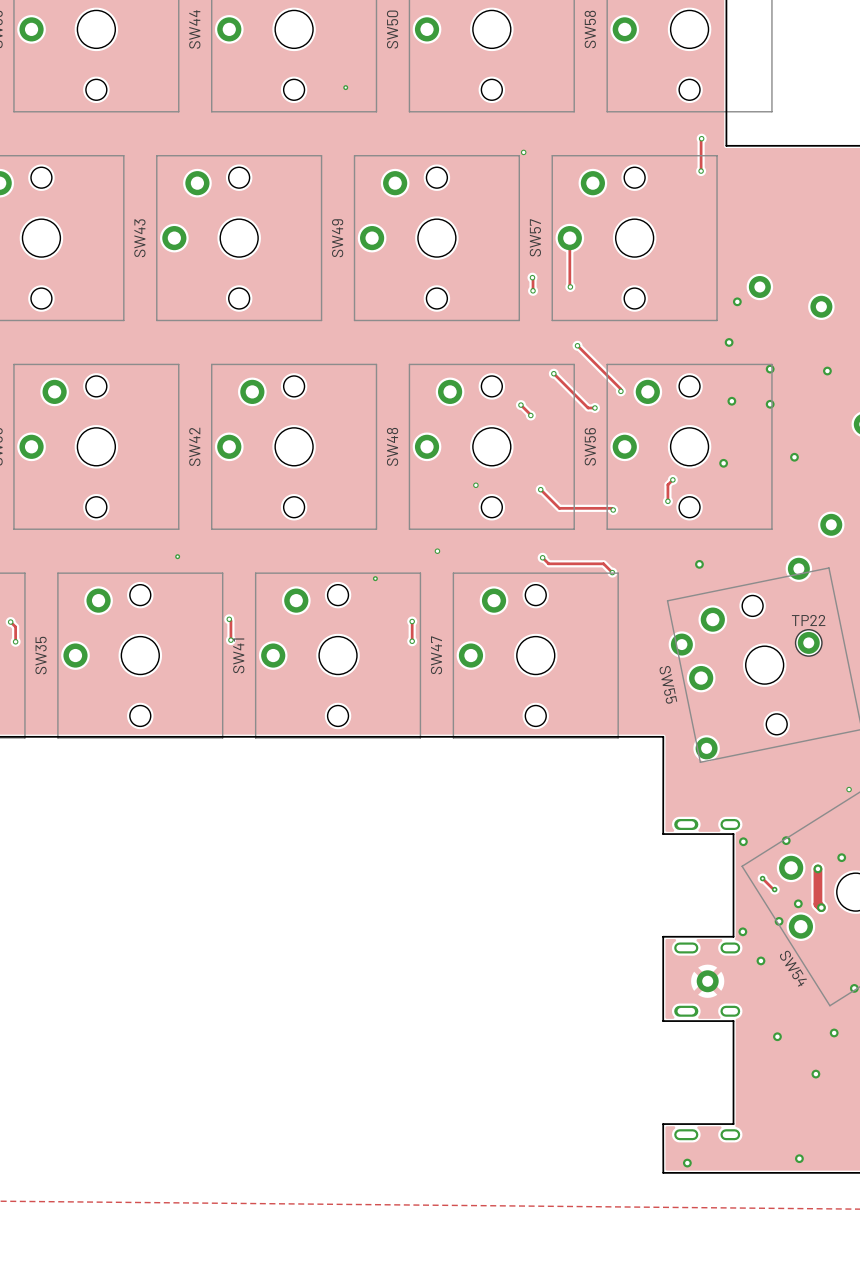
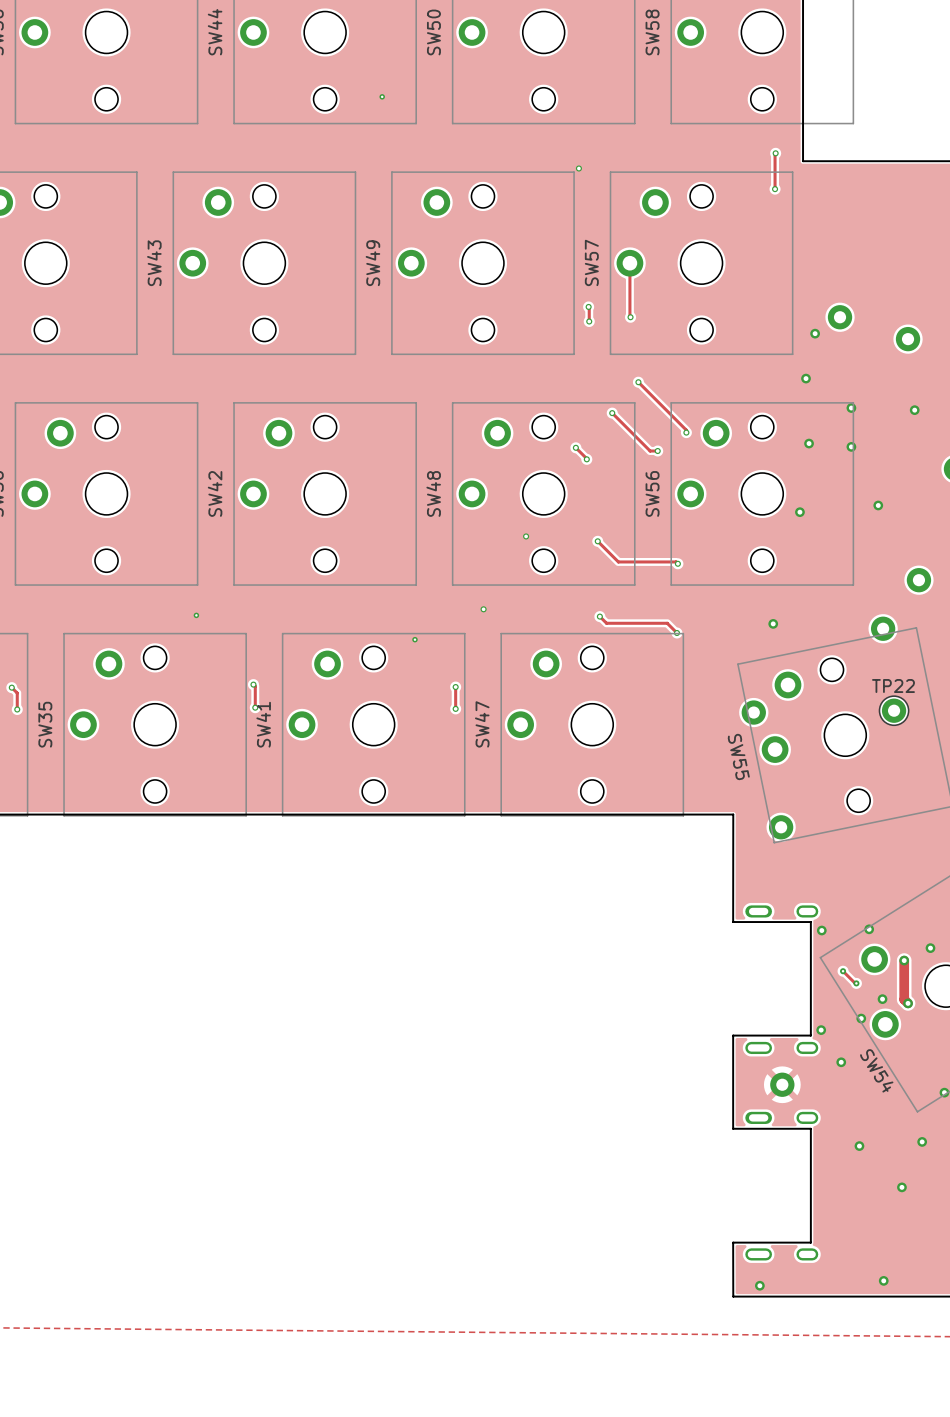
track: (672, 479) (667, 484) (667, 501) -> none
via: (672, 479) -> none
via: (667, 501) -> none
via: (849, 789) -> none

